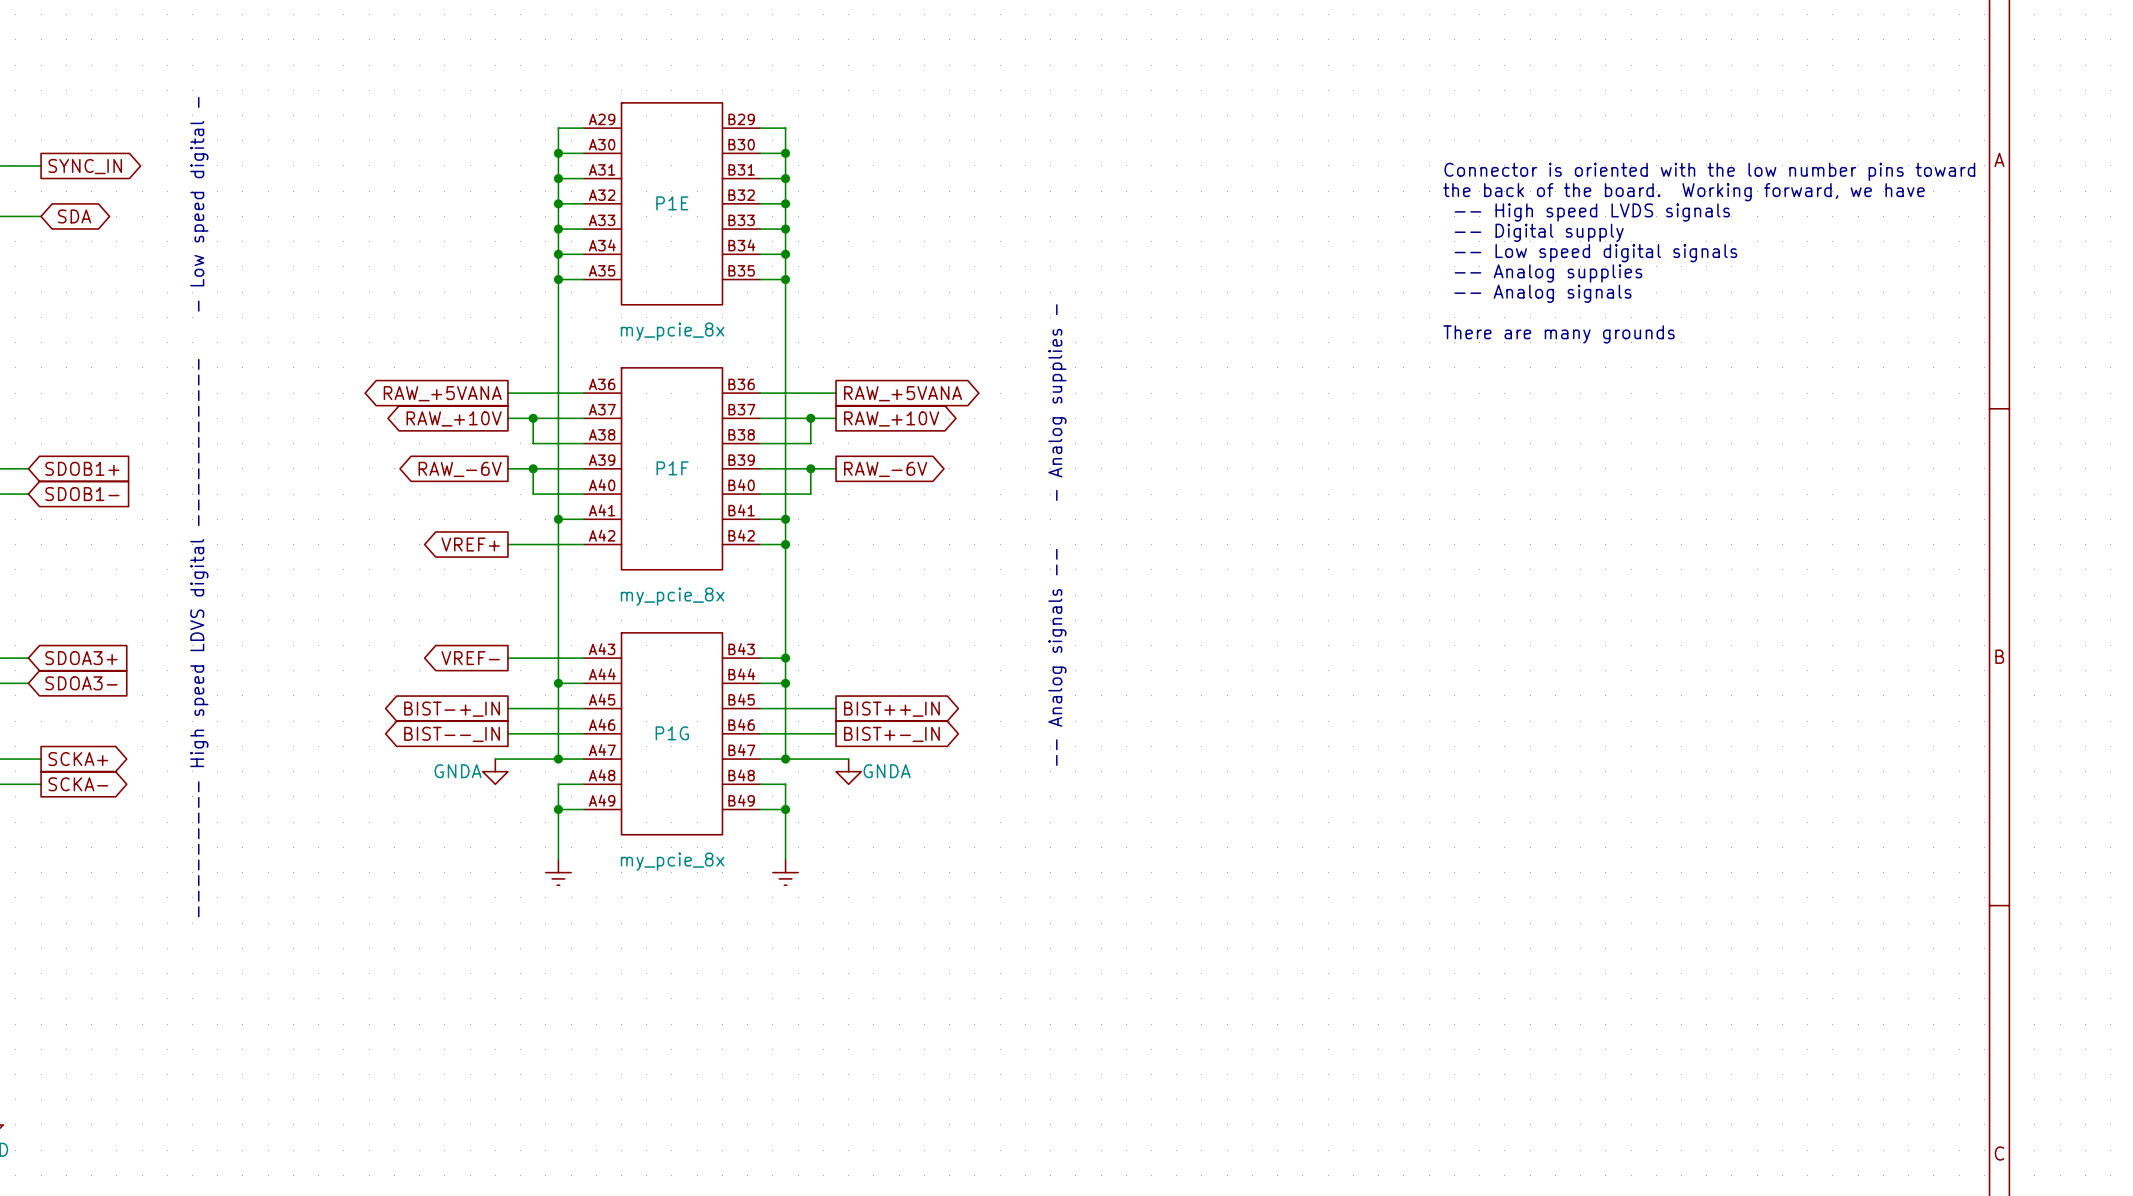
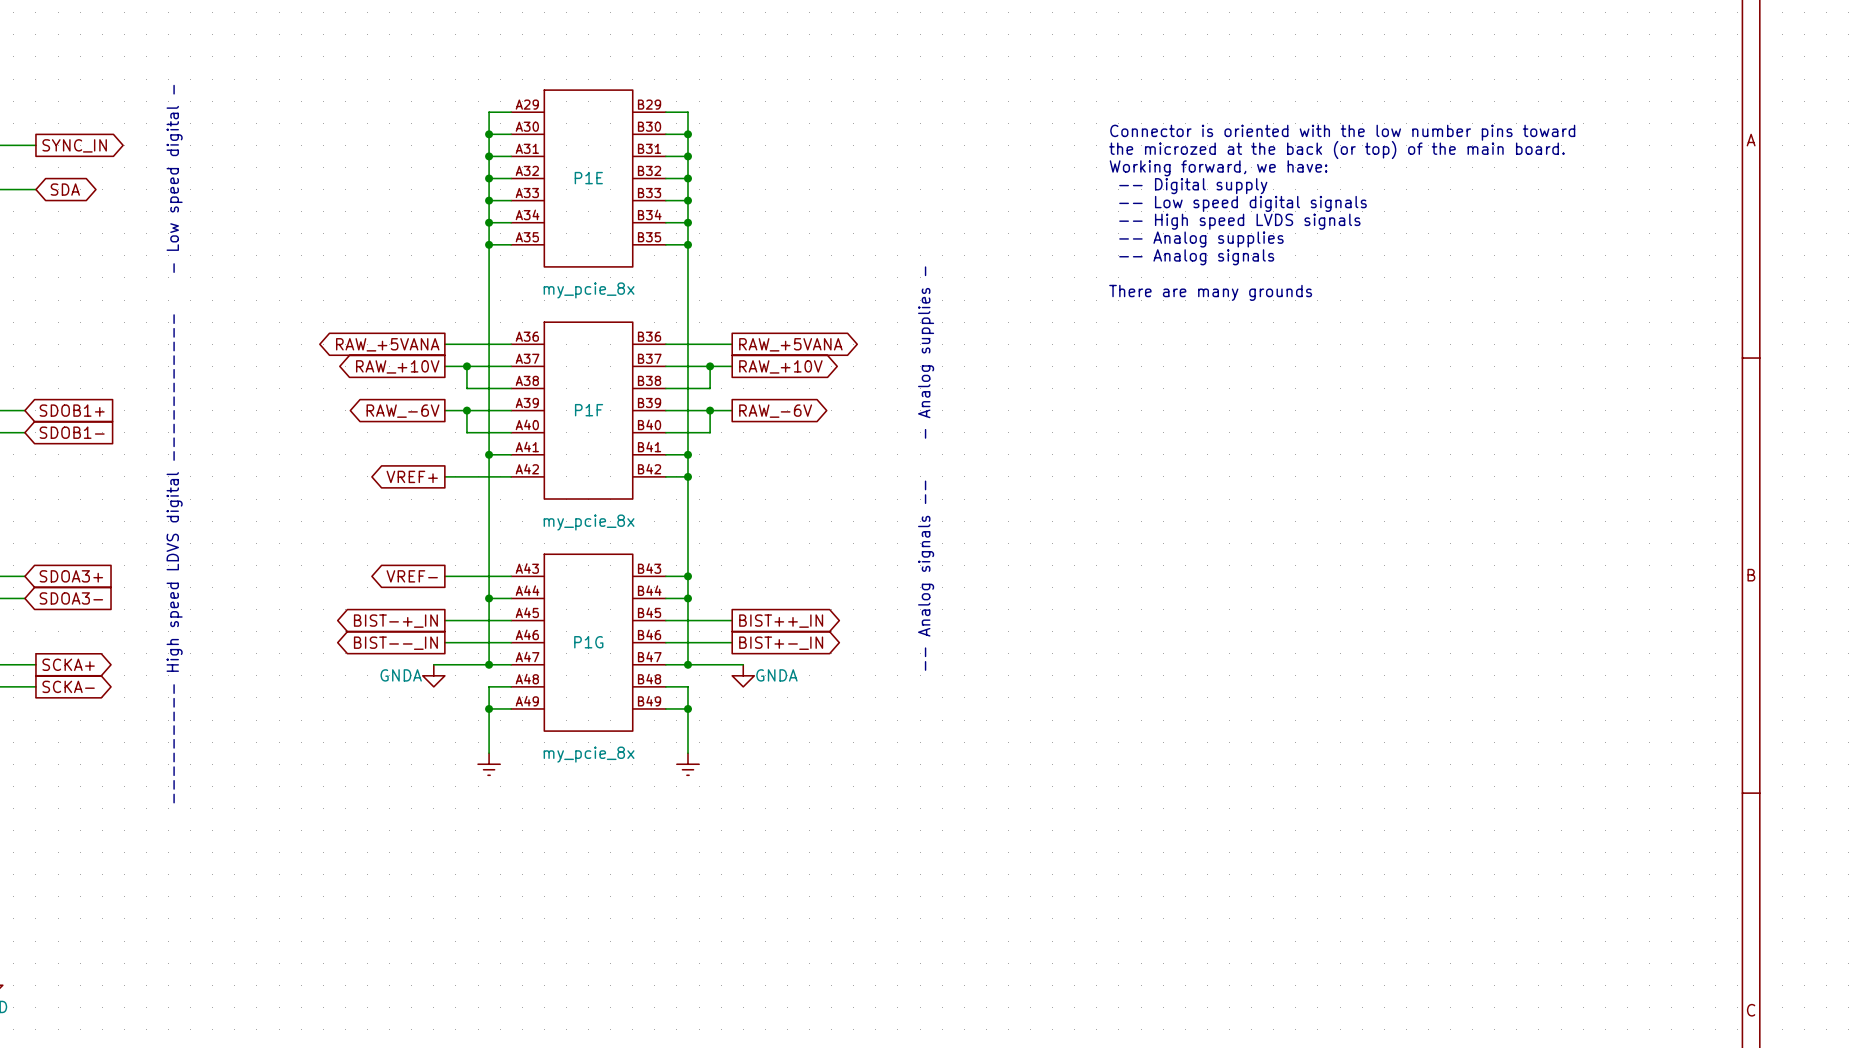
text: none -> the microzed at the back (or top) of the main board. (1336, 150)
text position: Connector is oriented with the low number pins toward (1709, 171) -> Connector is oriented with the low number pins toward (1342, 132)
text: the back of the board. Working forward, we have (1683, 192) -> Working forward, we have: (1218, 168)
text position: -- High speed LVDS signals (1592, 212) -> -- High speed LVDS signals (1239, 221)
text position: -- Digital supply (1539, 232) -> -- Digital supply (1193, 186)
text position: -- Low speed digital signals (1595, 253) -> -- Low speed digital signals (1243, 203)
text position: -- Analog supplies (1548, 273) -> -- Analog supplies (1201, 239)
text position: -- Analog signals (1543, 293) -> -- Analog signals (1196, 257)
text position: There are many grounds (1559, 334) -> There are many grounds (1210, 292)

